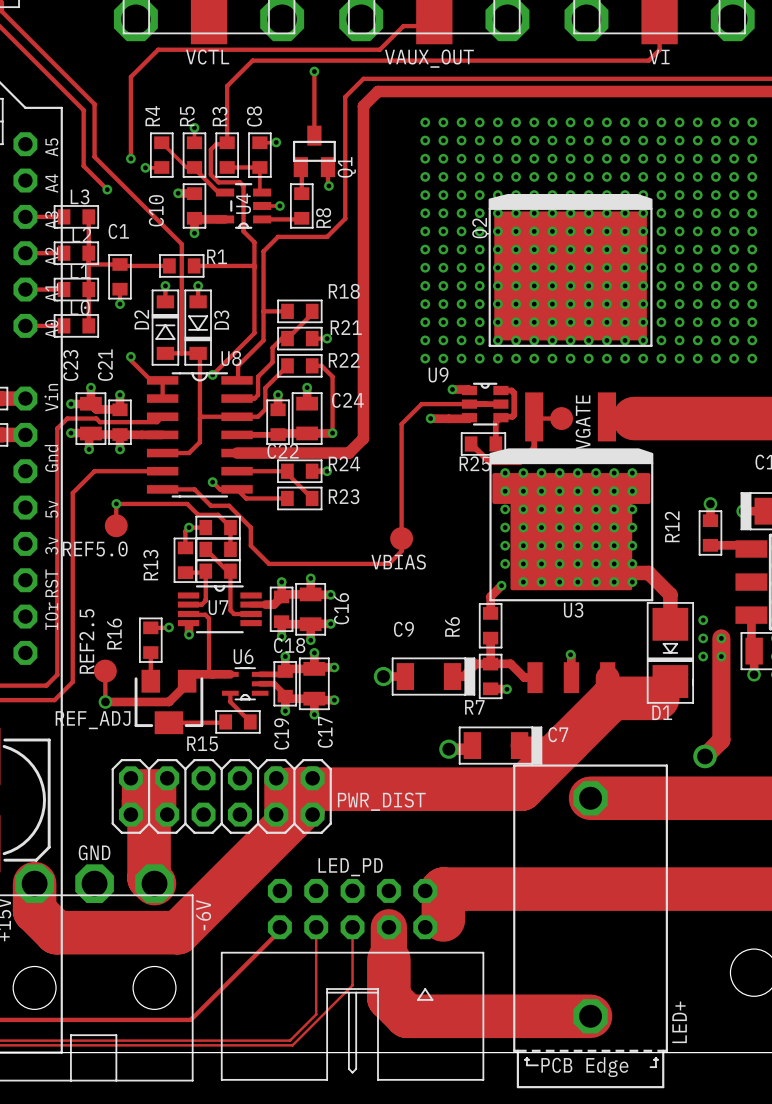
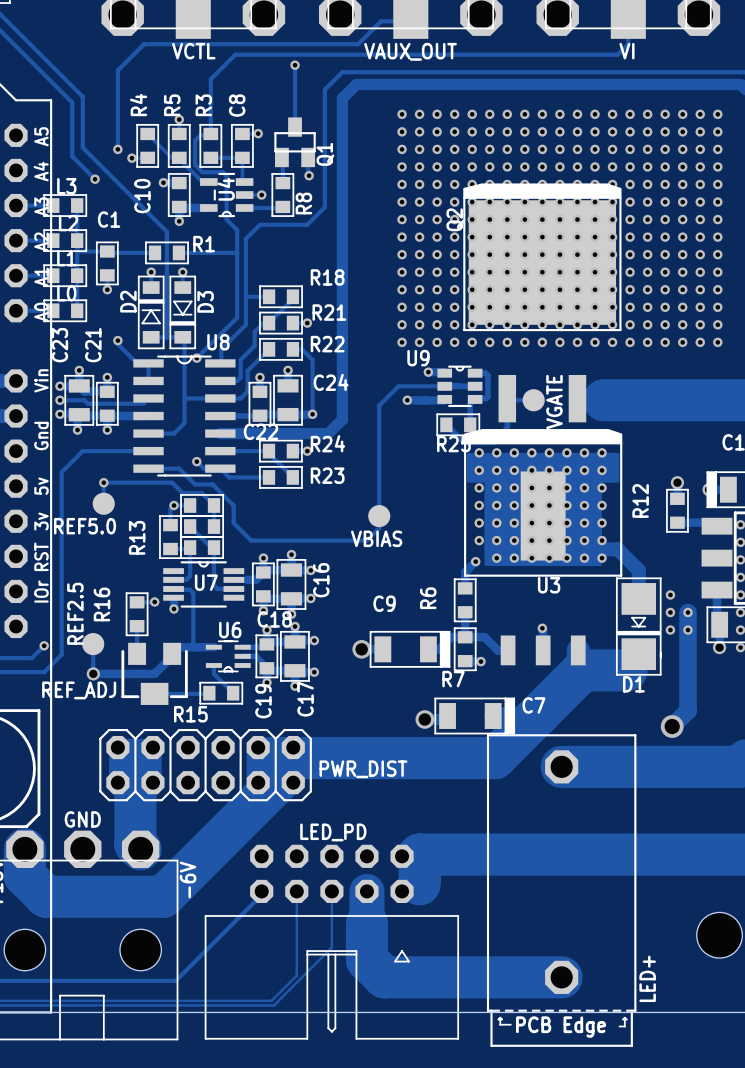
track: (70, 418) (67, 418) (57, 428) (57, 674) (46, 685) (41, 685) -> (44, 645) (31, 658)
via: none -> (59, 400)
via: none -> (44, 645)

